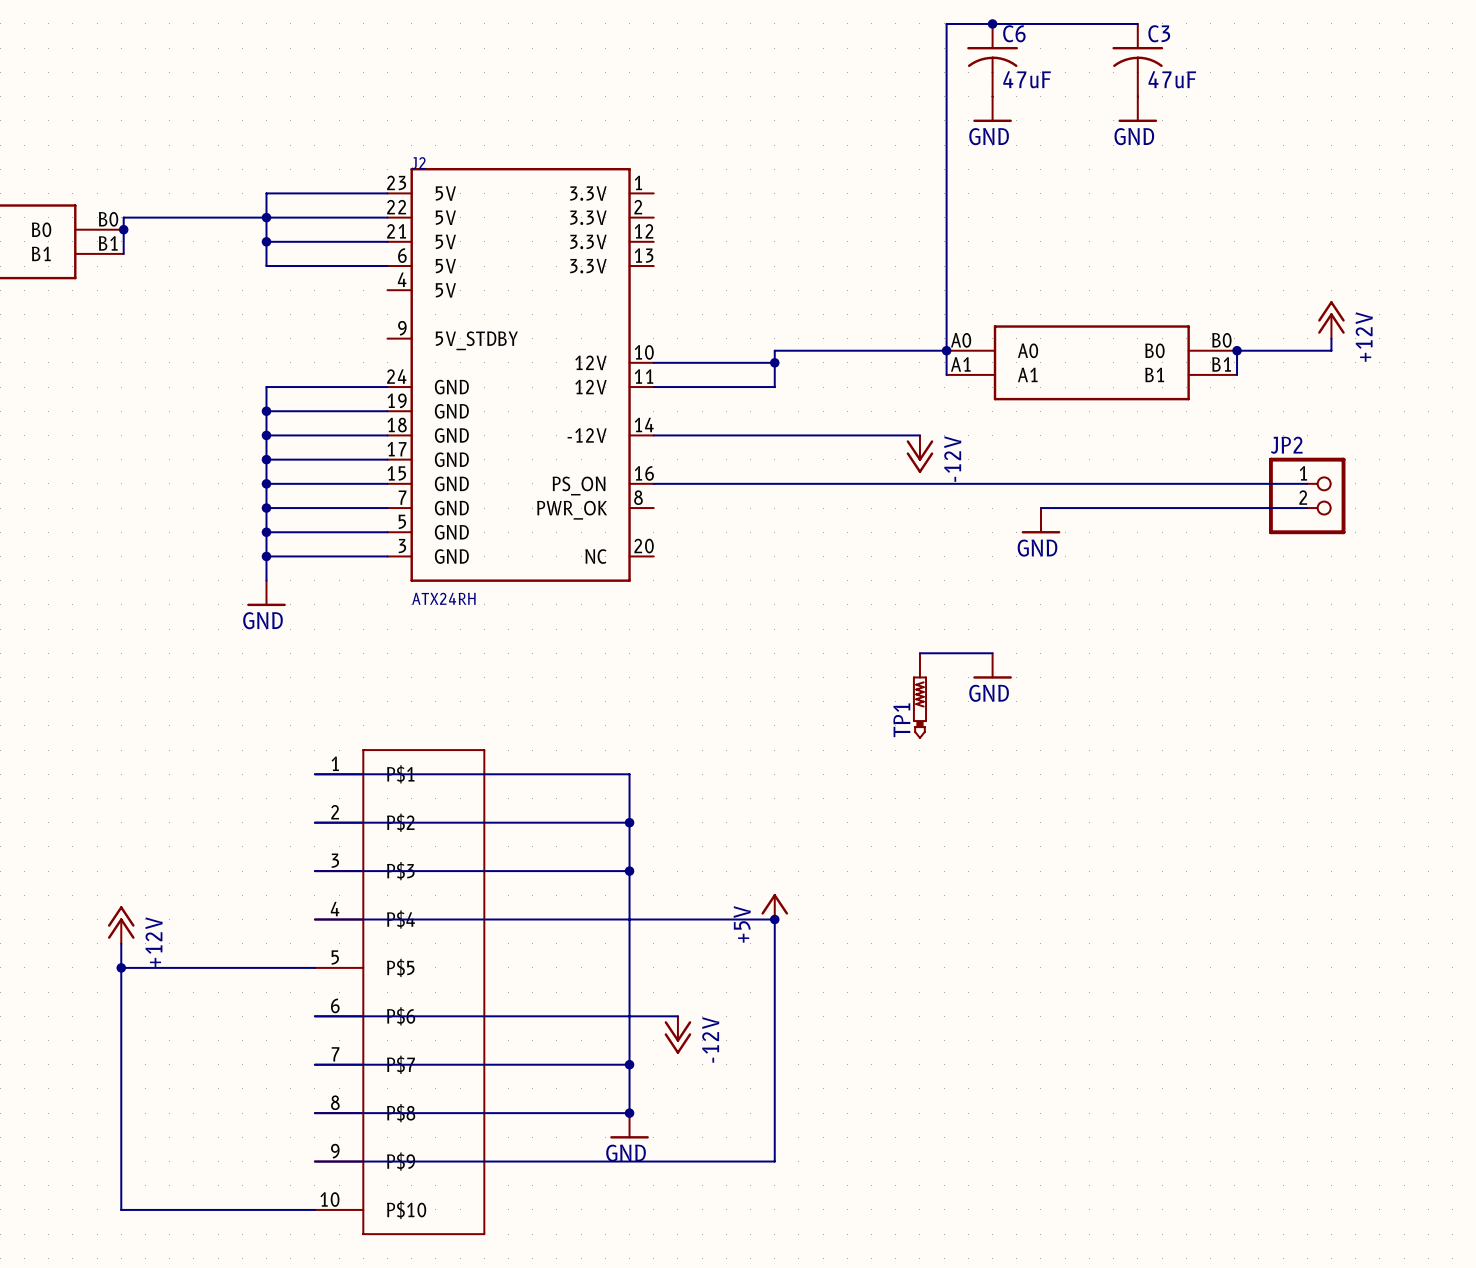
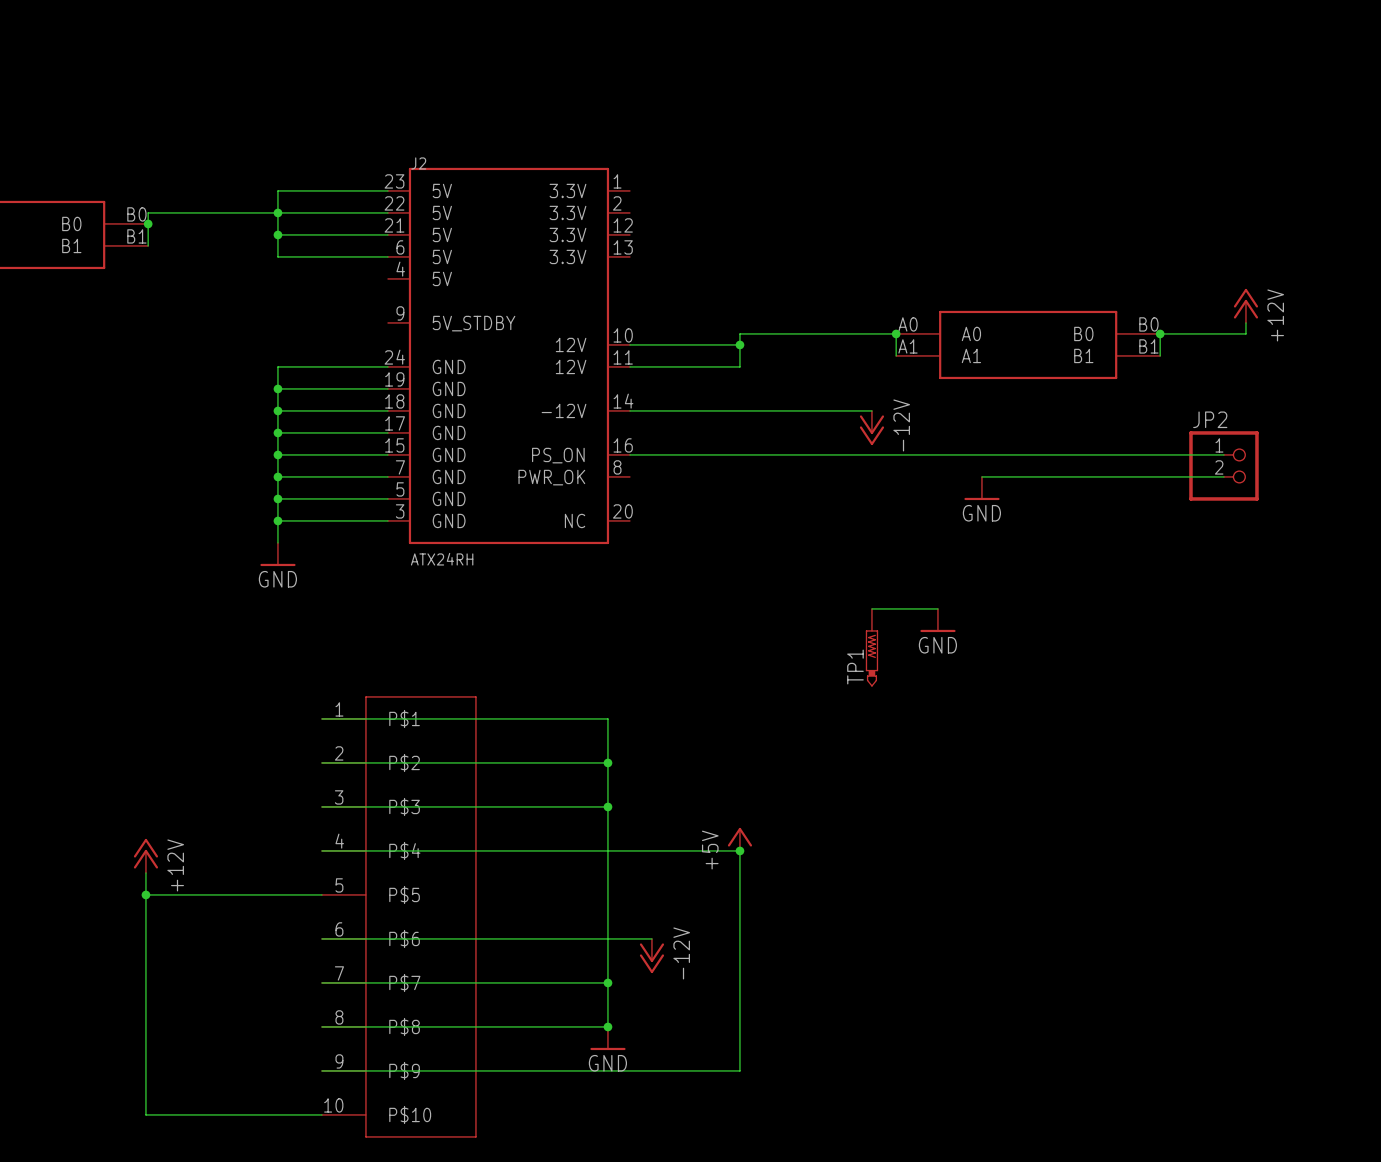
junction: (992, 23) -> none
wire: (1137, 23) (946, 23) (946, 350) -> none
C6: 47uF (992, 60) -> none
C3: 47uF (1137, 60) -> none
power symbol: GND (992, 109) -> none
power symbol: GND (1137, 109) -> none

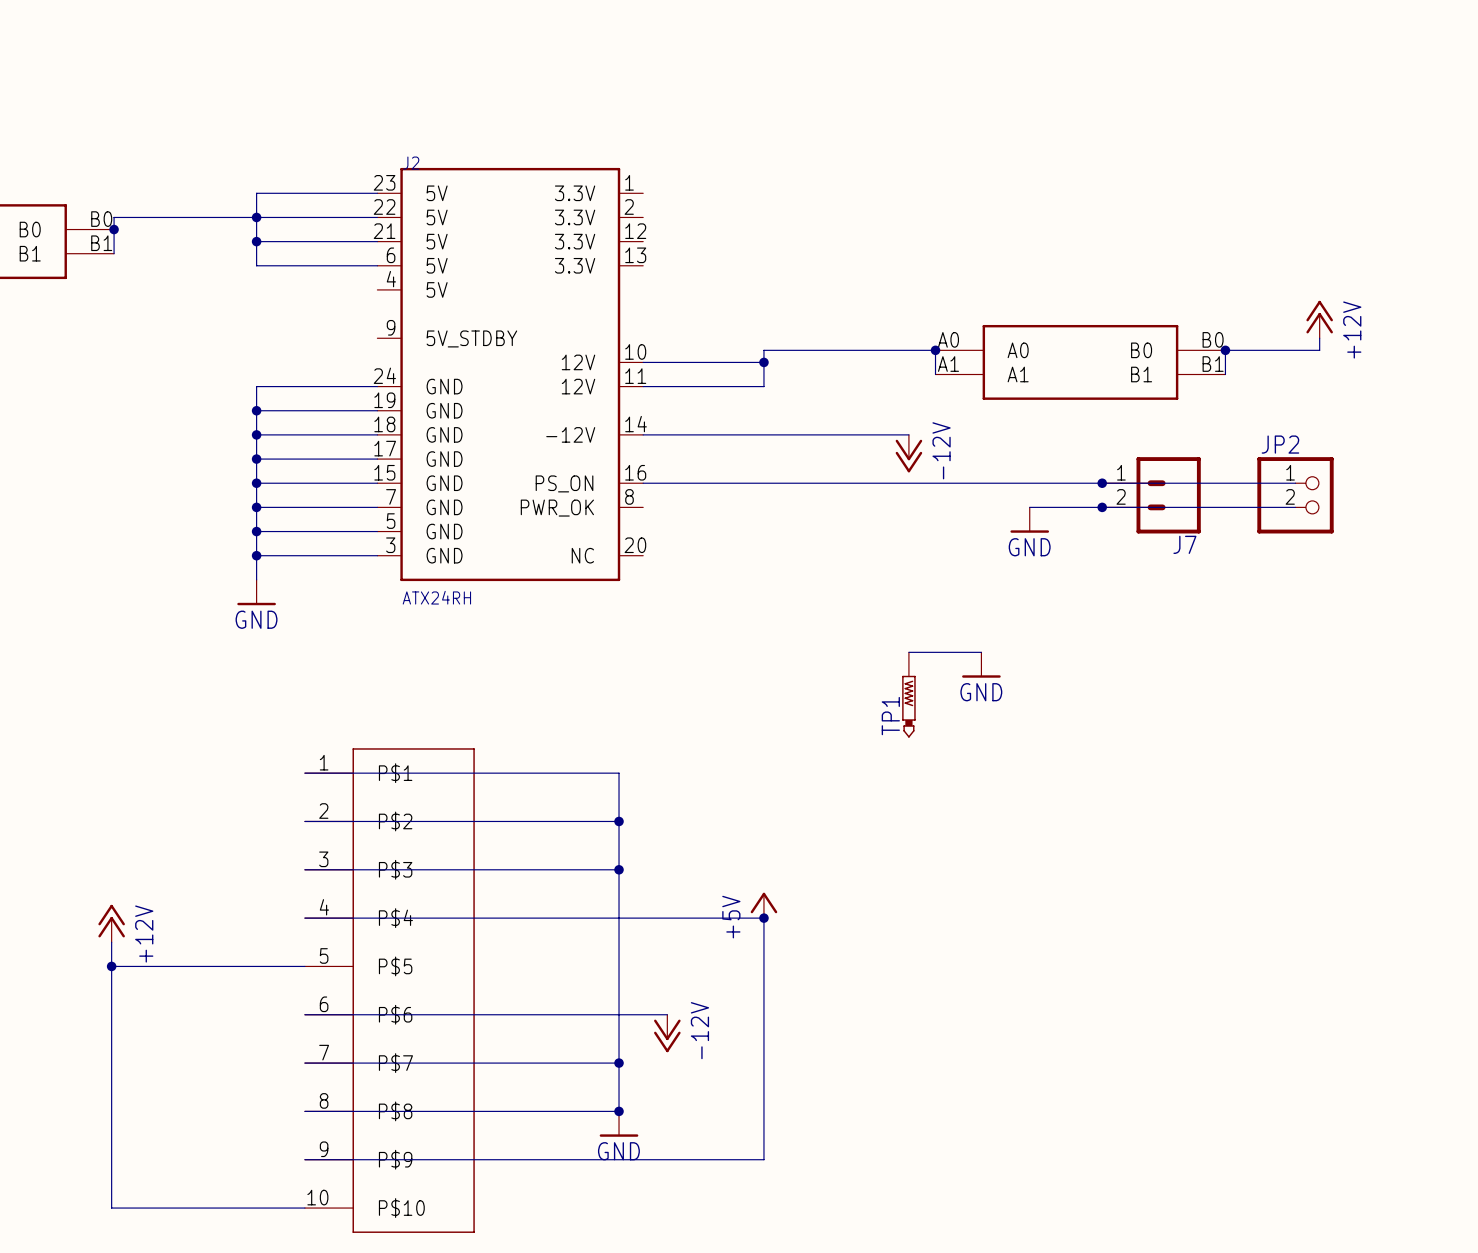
junction: none -> (1102, 483)
J7: none -> (1151, 495)
junction: none -> (1102, 507)

